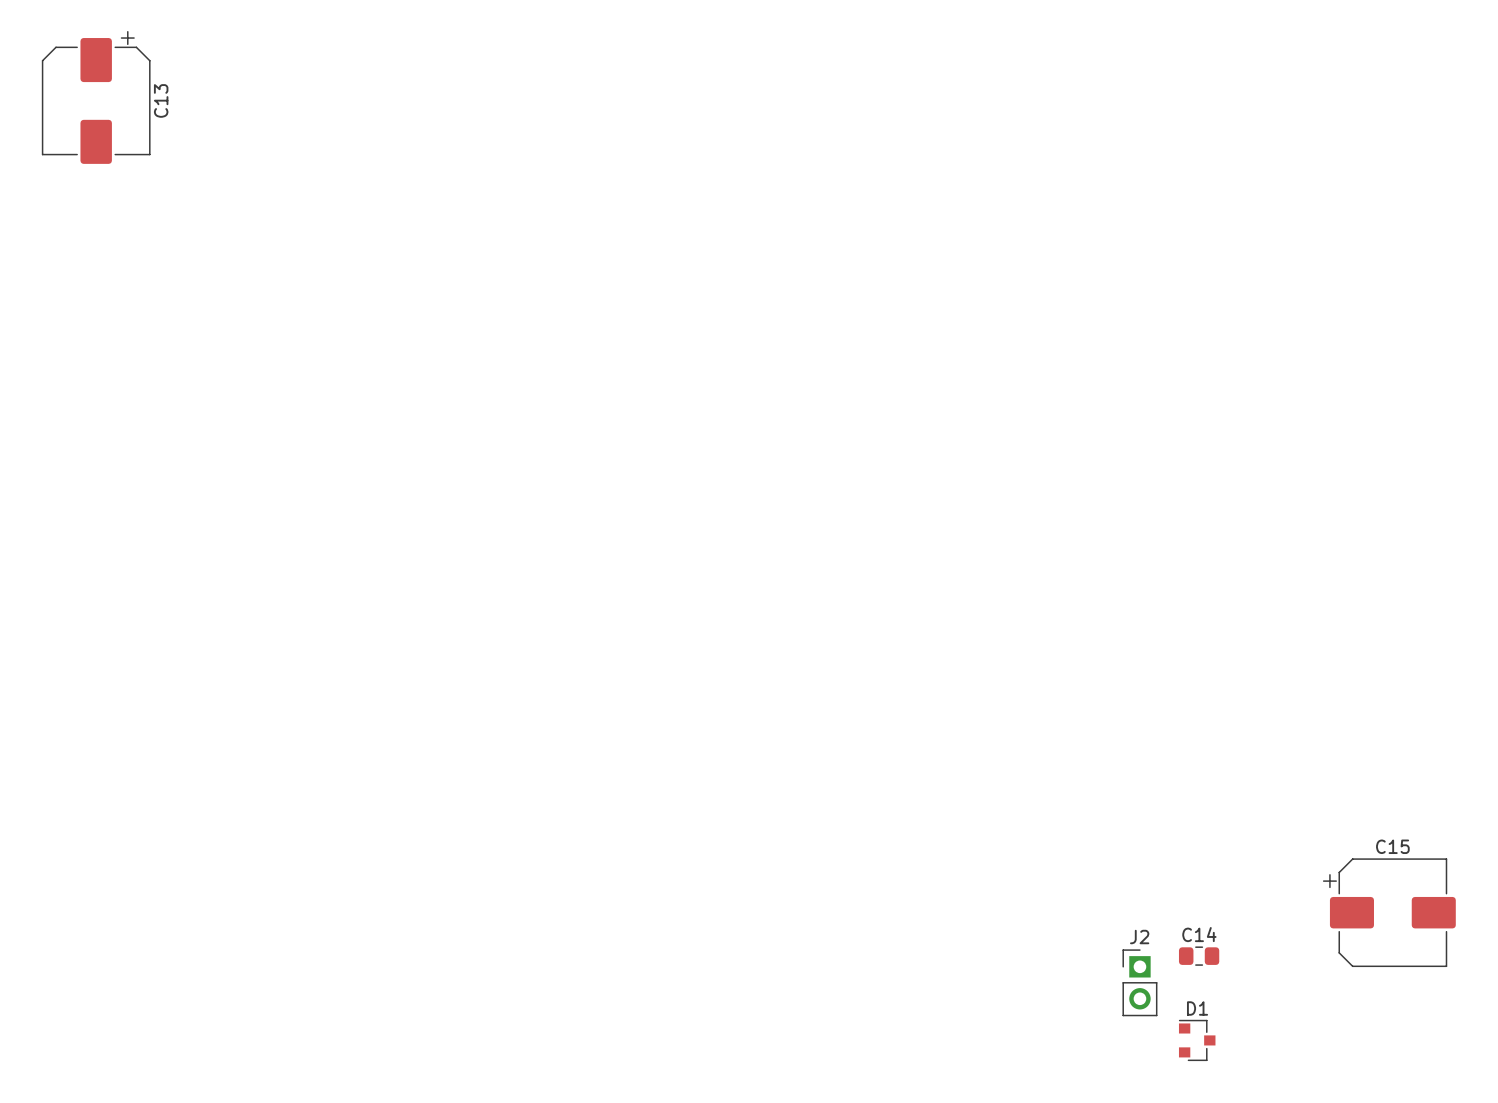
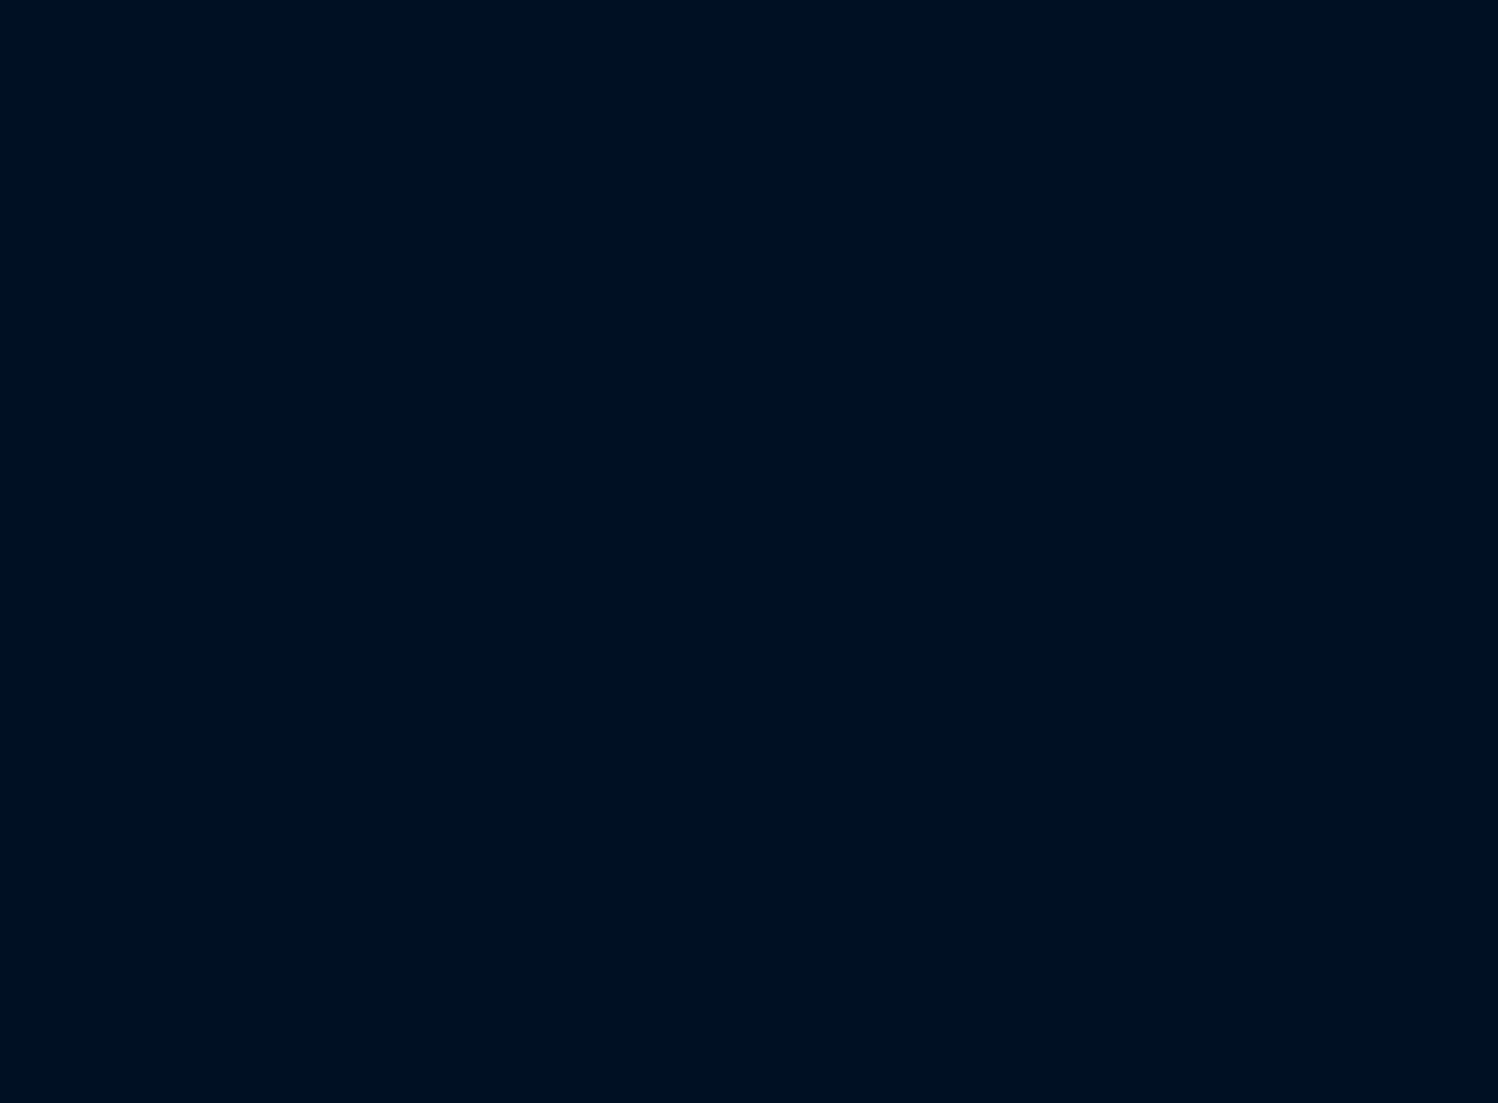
C13: (96, 97) -> none
C15: (1389, 912) -> none
C14: (1199, 956) -> none
J2: (1139, 982) -> none
D1: (1197, 1040) -> none

